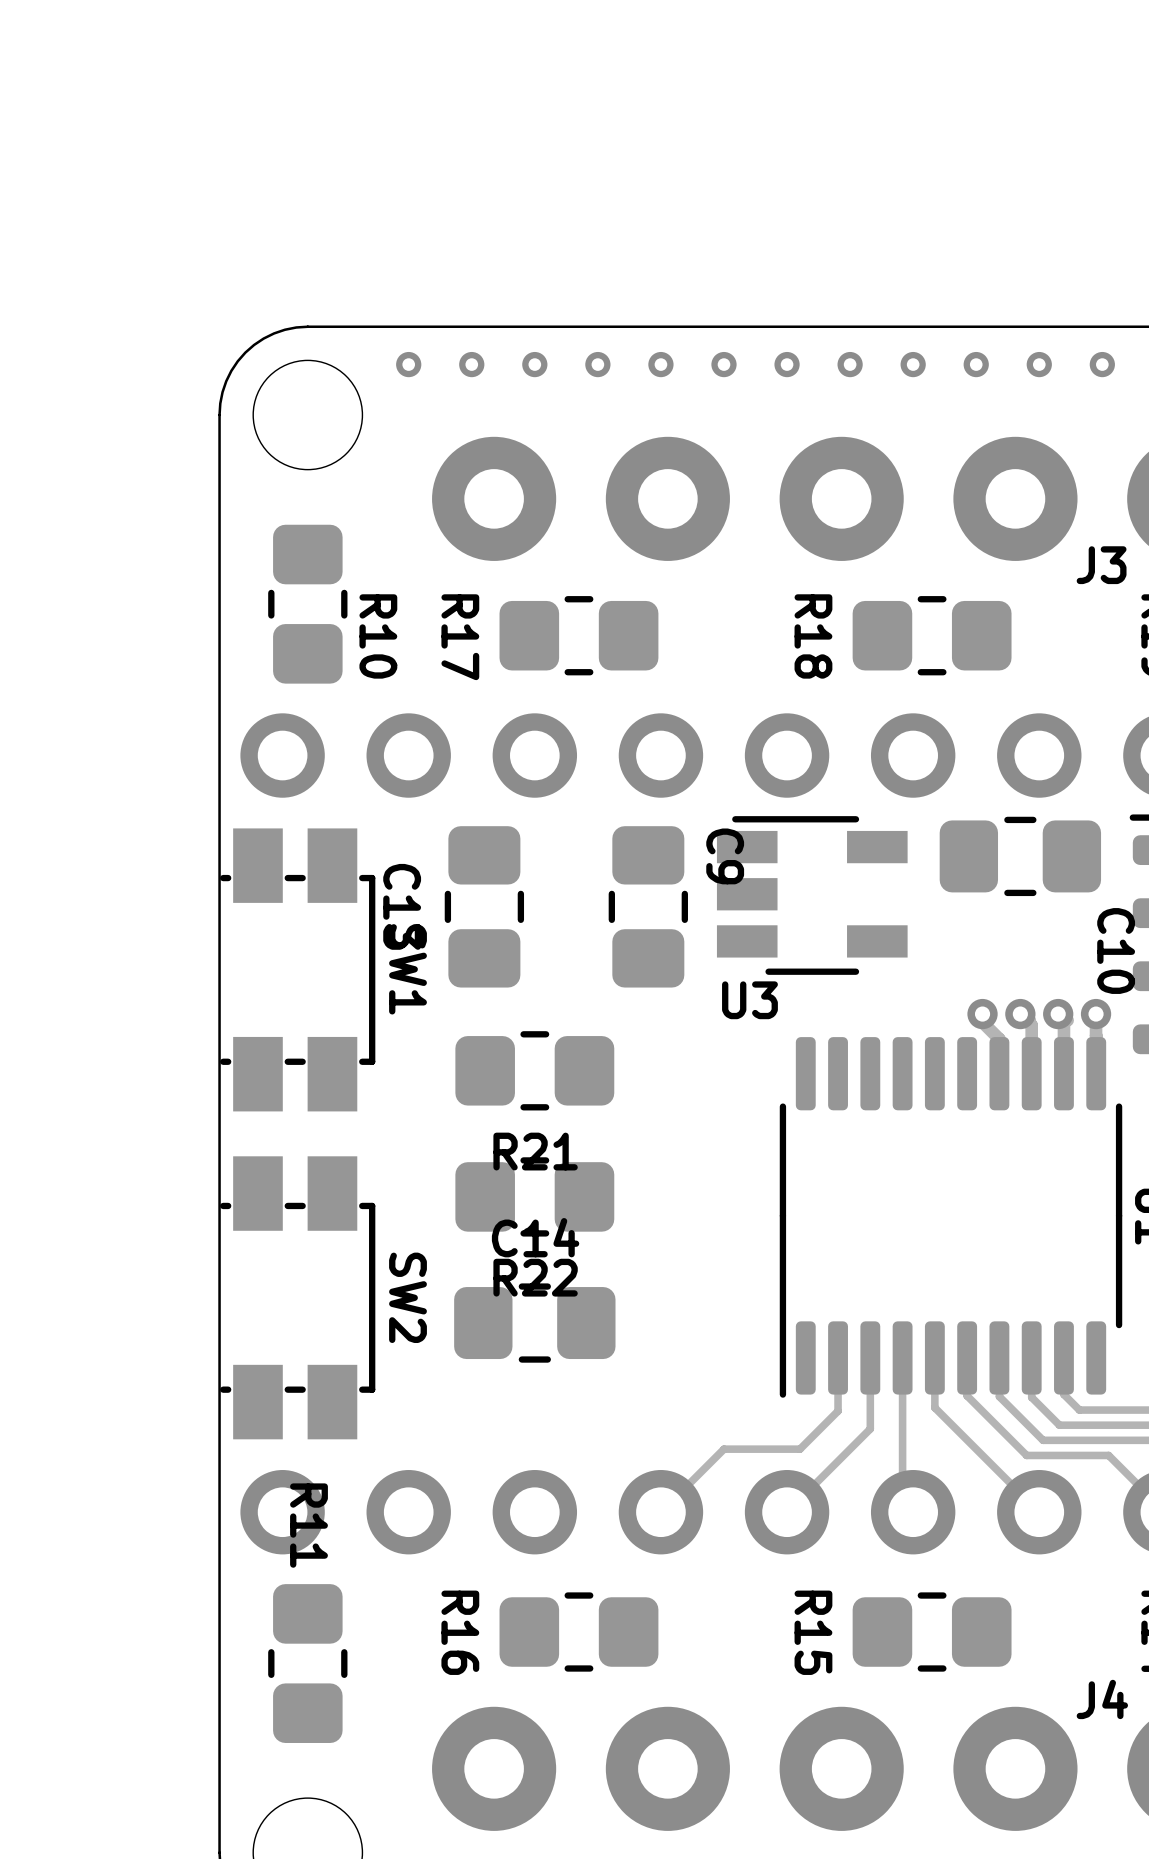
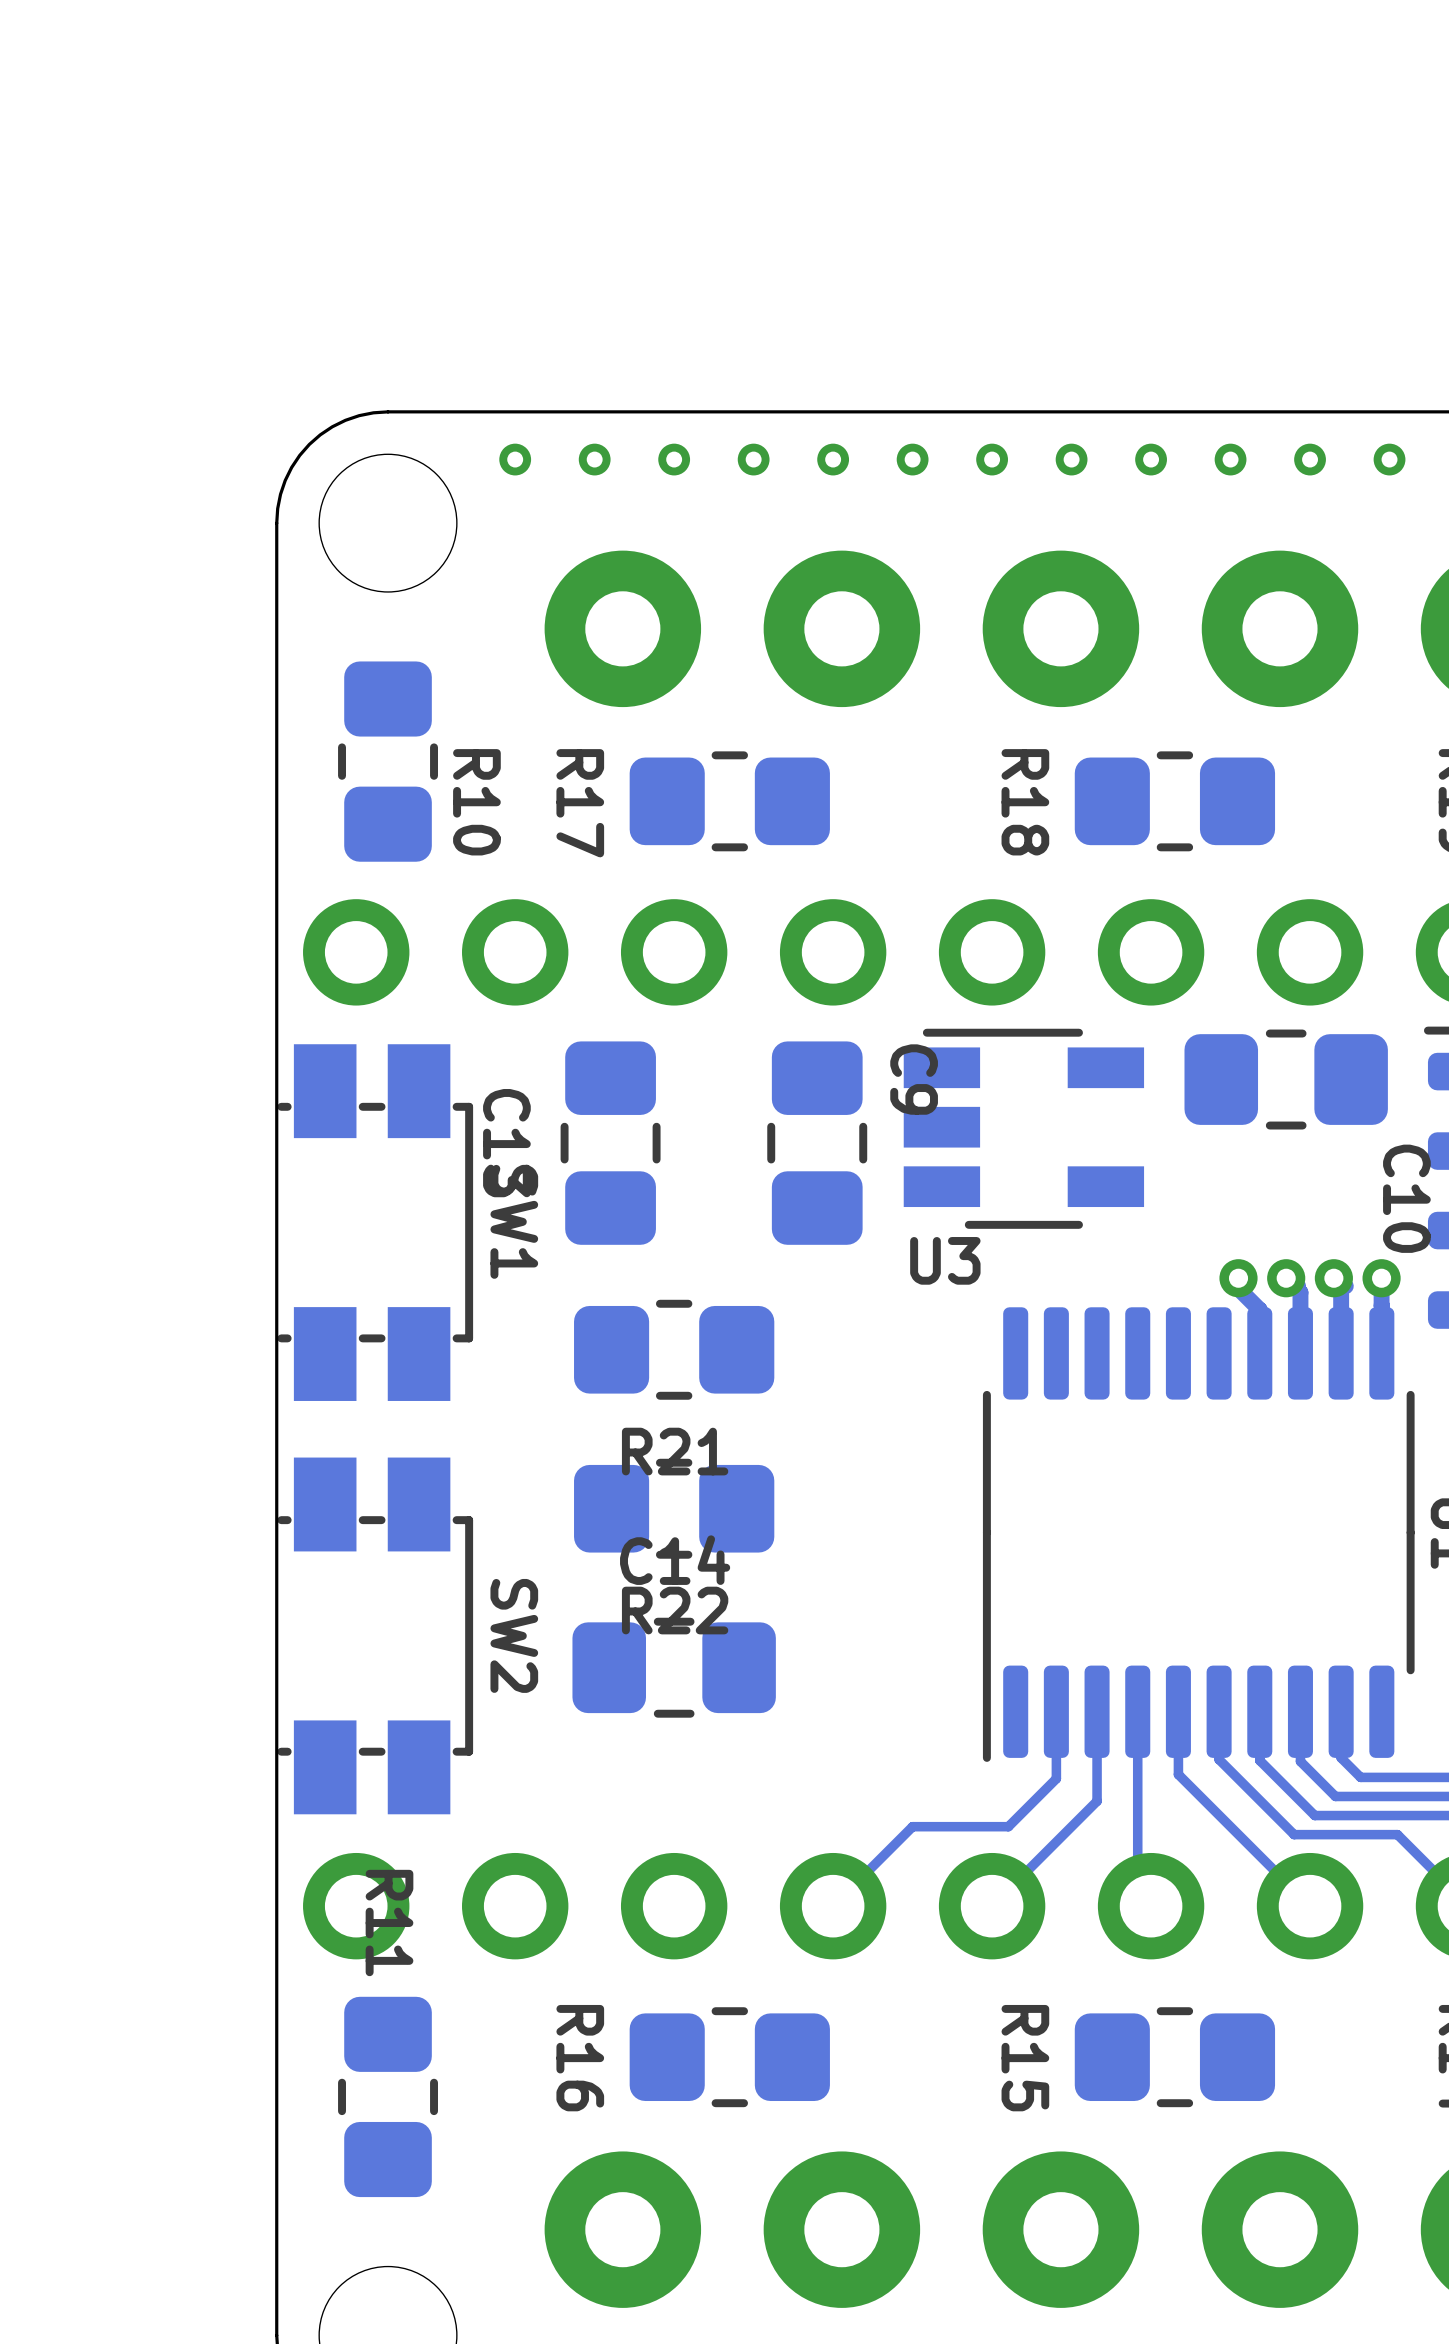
J3 name: J3 (1101, 565) -> none
J4 name: J4 (1102, 1699) -> none

